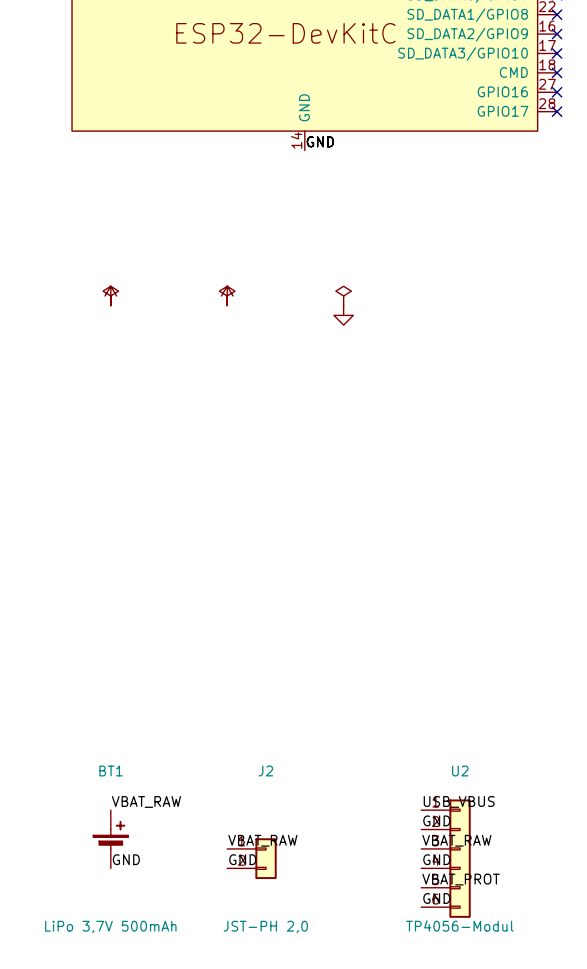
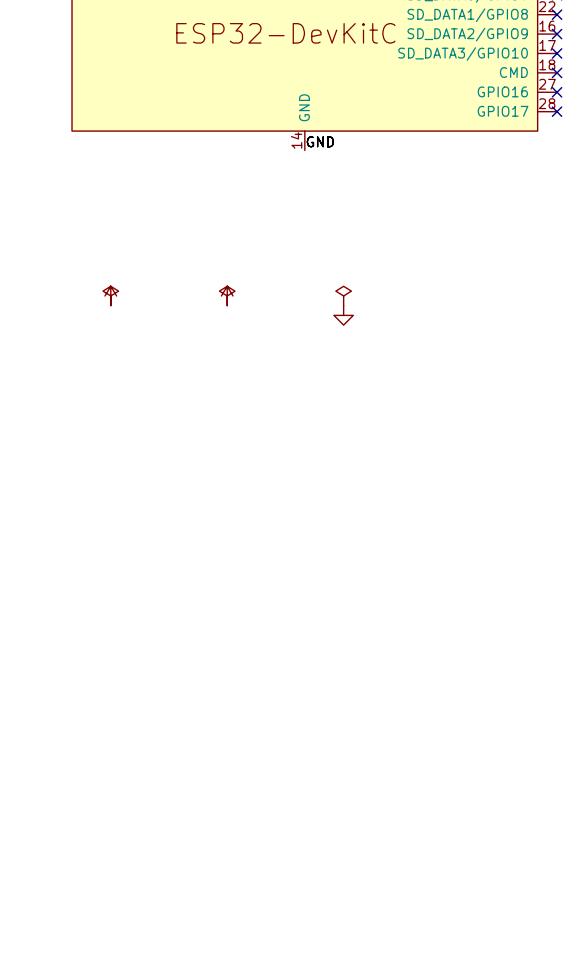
label: VBAT_RAW (146, 801) -> none
label: USB_VBUS (459, 801) -> none
label: GND (436, 820) -> none
BT1: LiPo 3,7V 500mAh (110, 839) -> none
label: VBAT_RAW (262, 840) -> none
label: VBAT_RAW (456, 840) -> none
J2: JST-PH 2,0 (251, 858) -> none
U2: TP4056-Modul (445, 858) -> none
label: GND (126, 859) -> none
label: GND (242, 859) -> none
label: GND (436, 859) -> none
label: VBAT_PROT (461, 879) -> none
label: GND (436, 898) -> none

